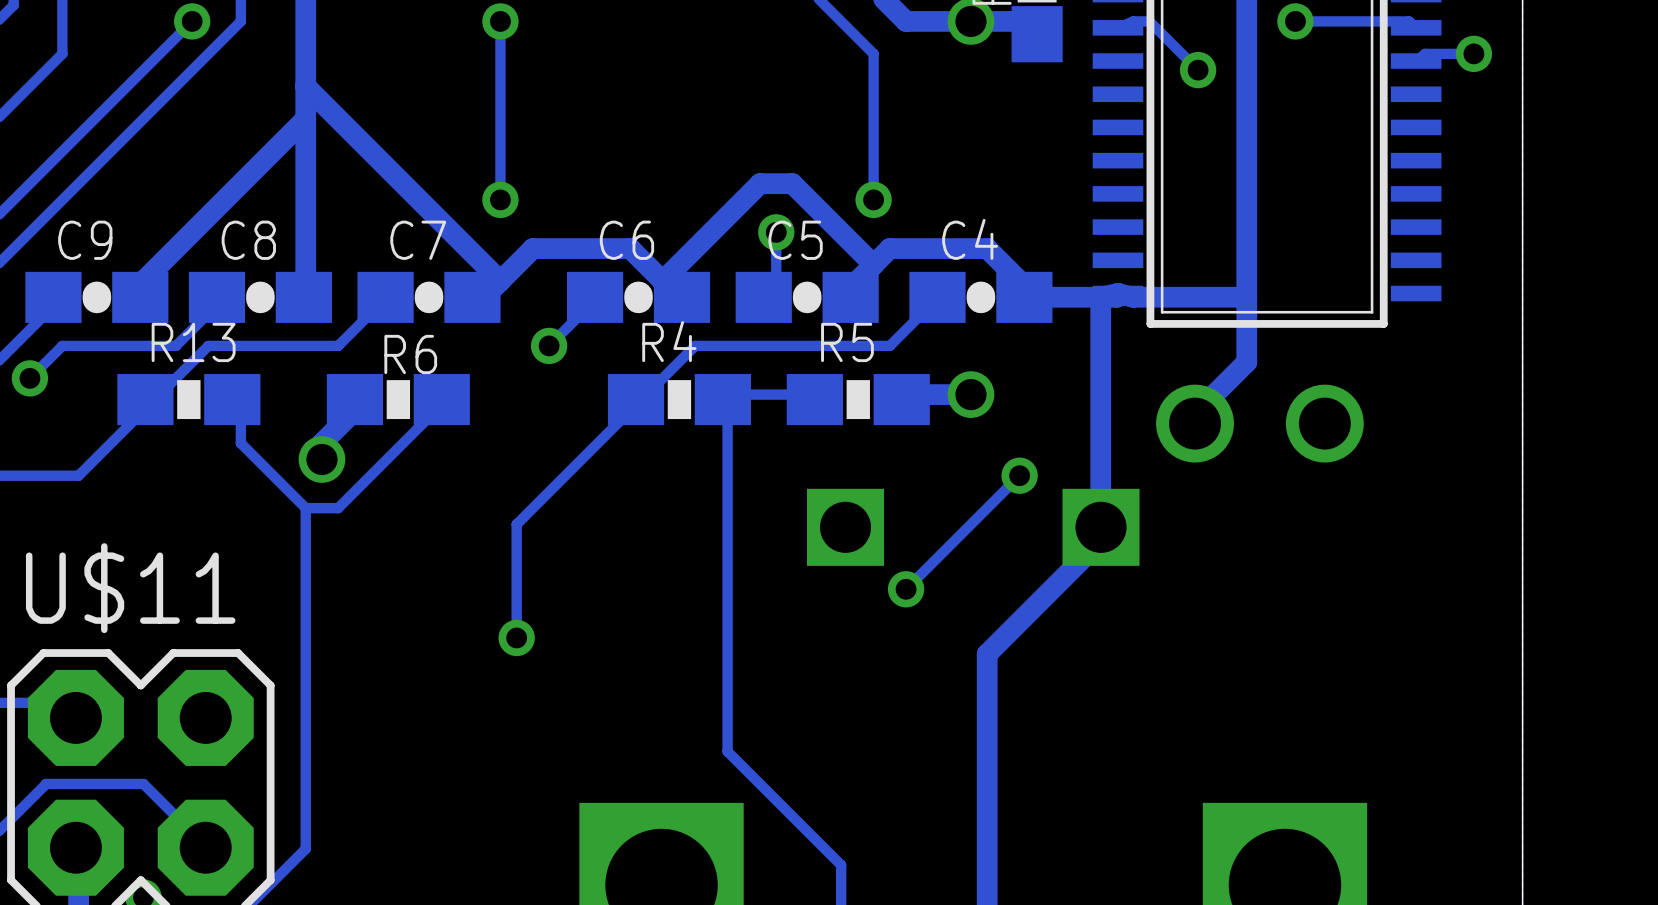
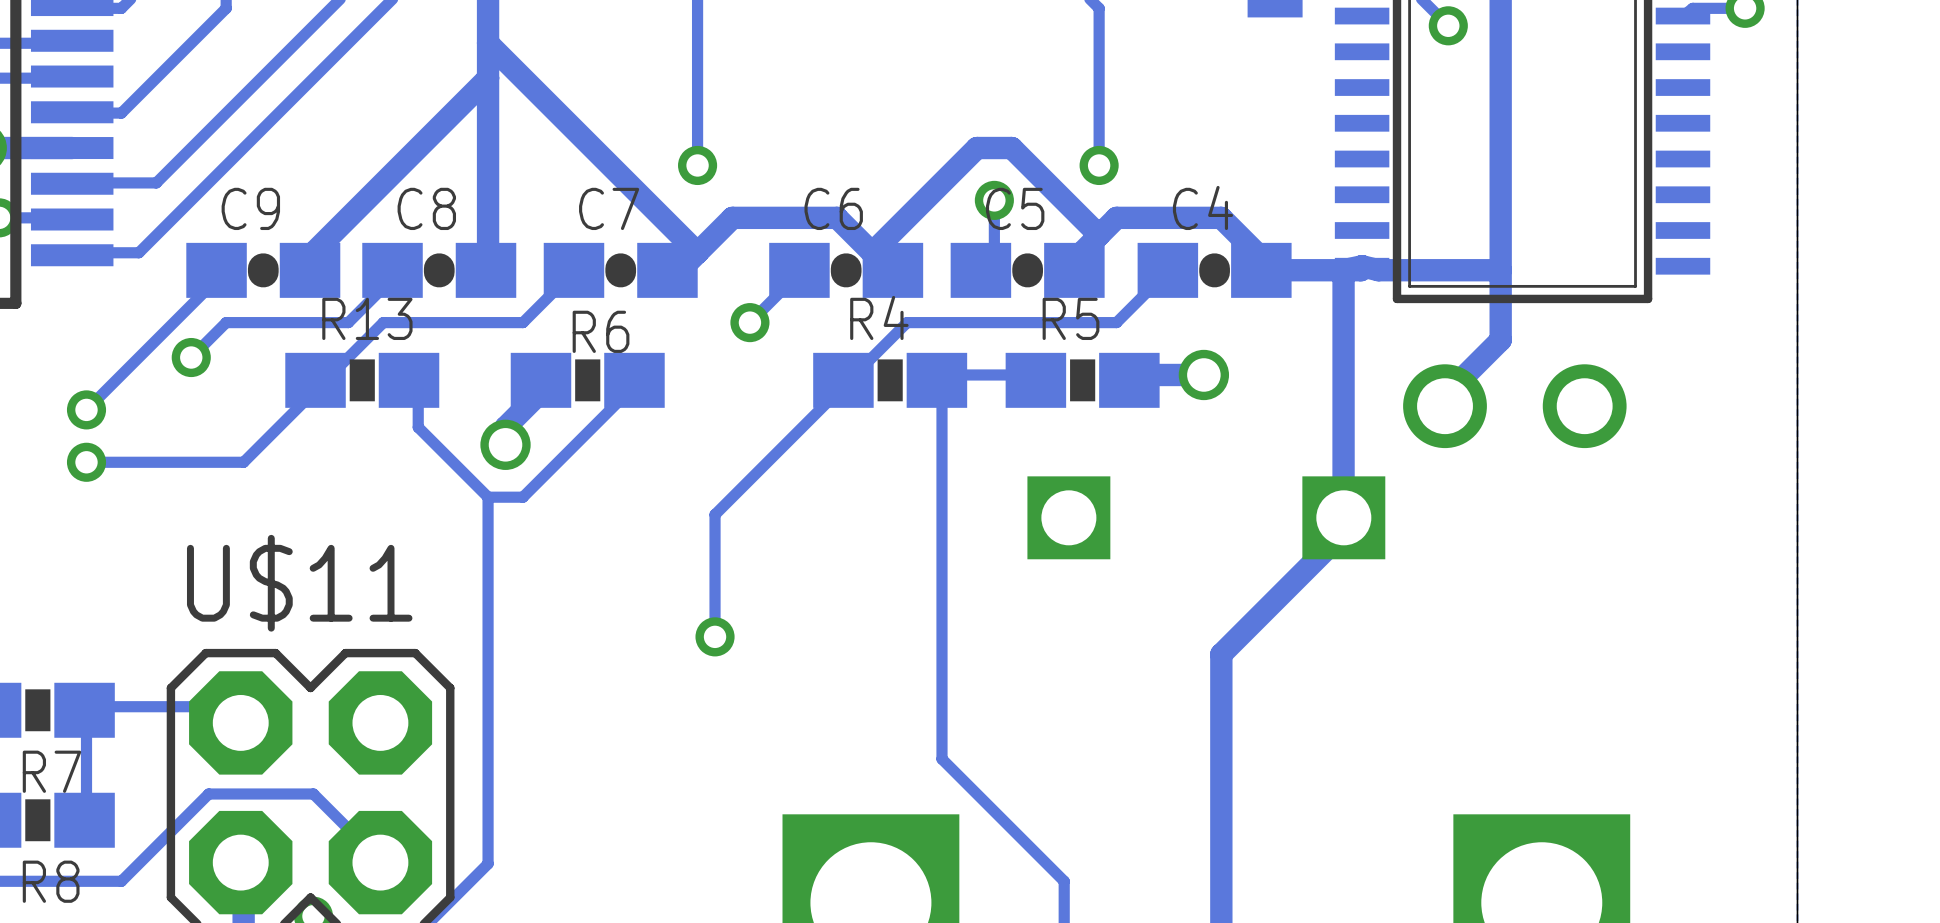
track: (1019, 475) (906, 589) -> none
via: (1019, 475) -> none
via: (906, 589) -> none

